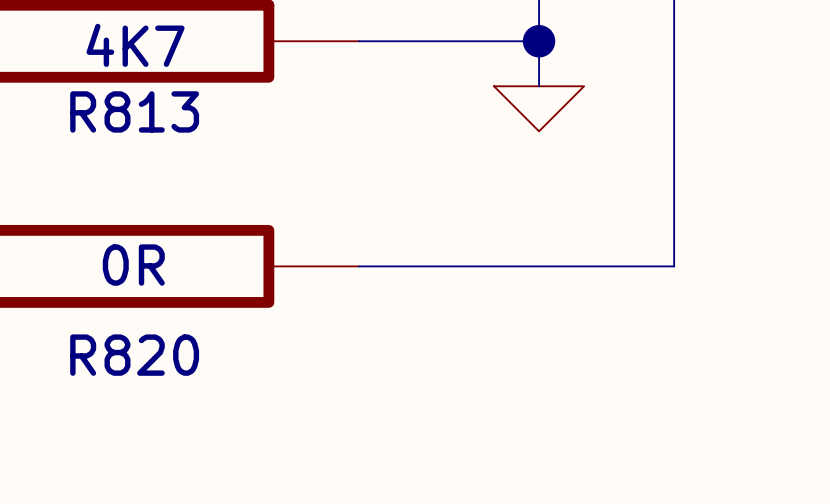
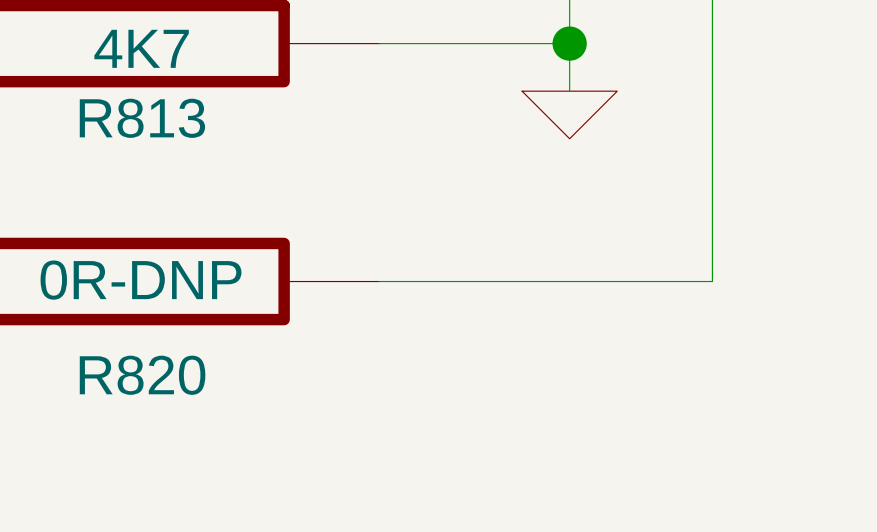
R820 value: 0R (133, 265) -> 0R-DNP (141, 280)

